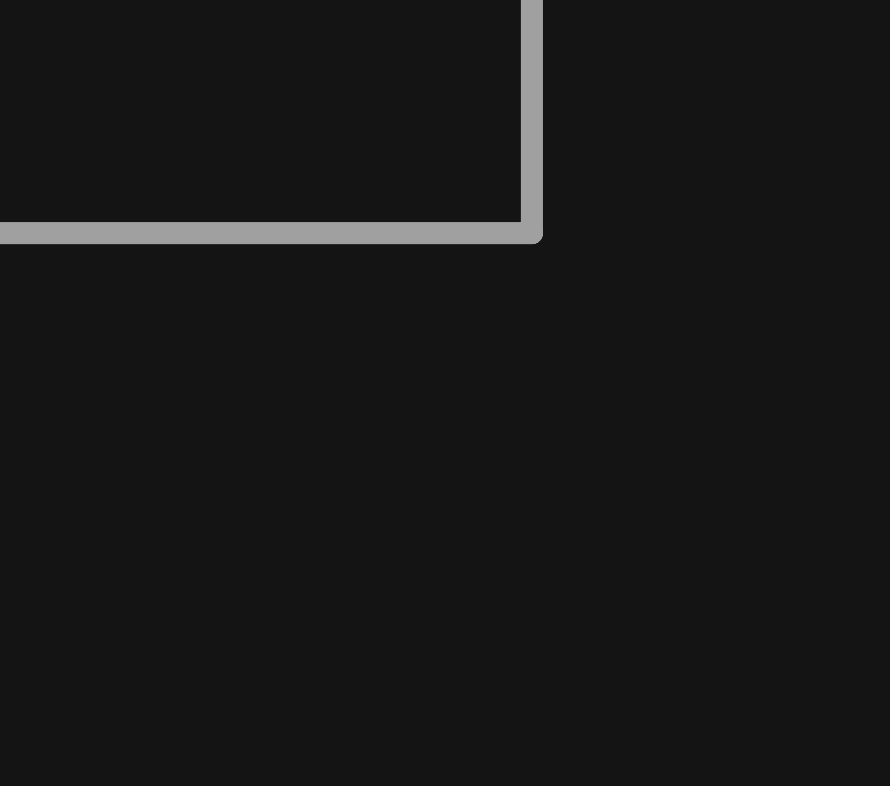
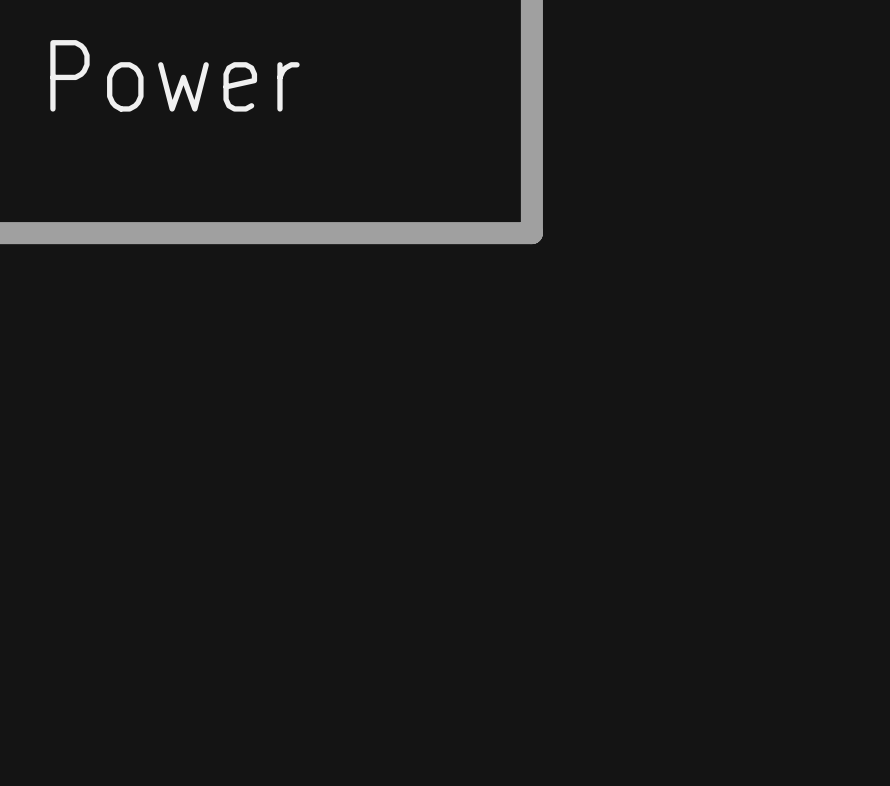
text: none -> Power (174, 75)

